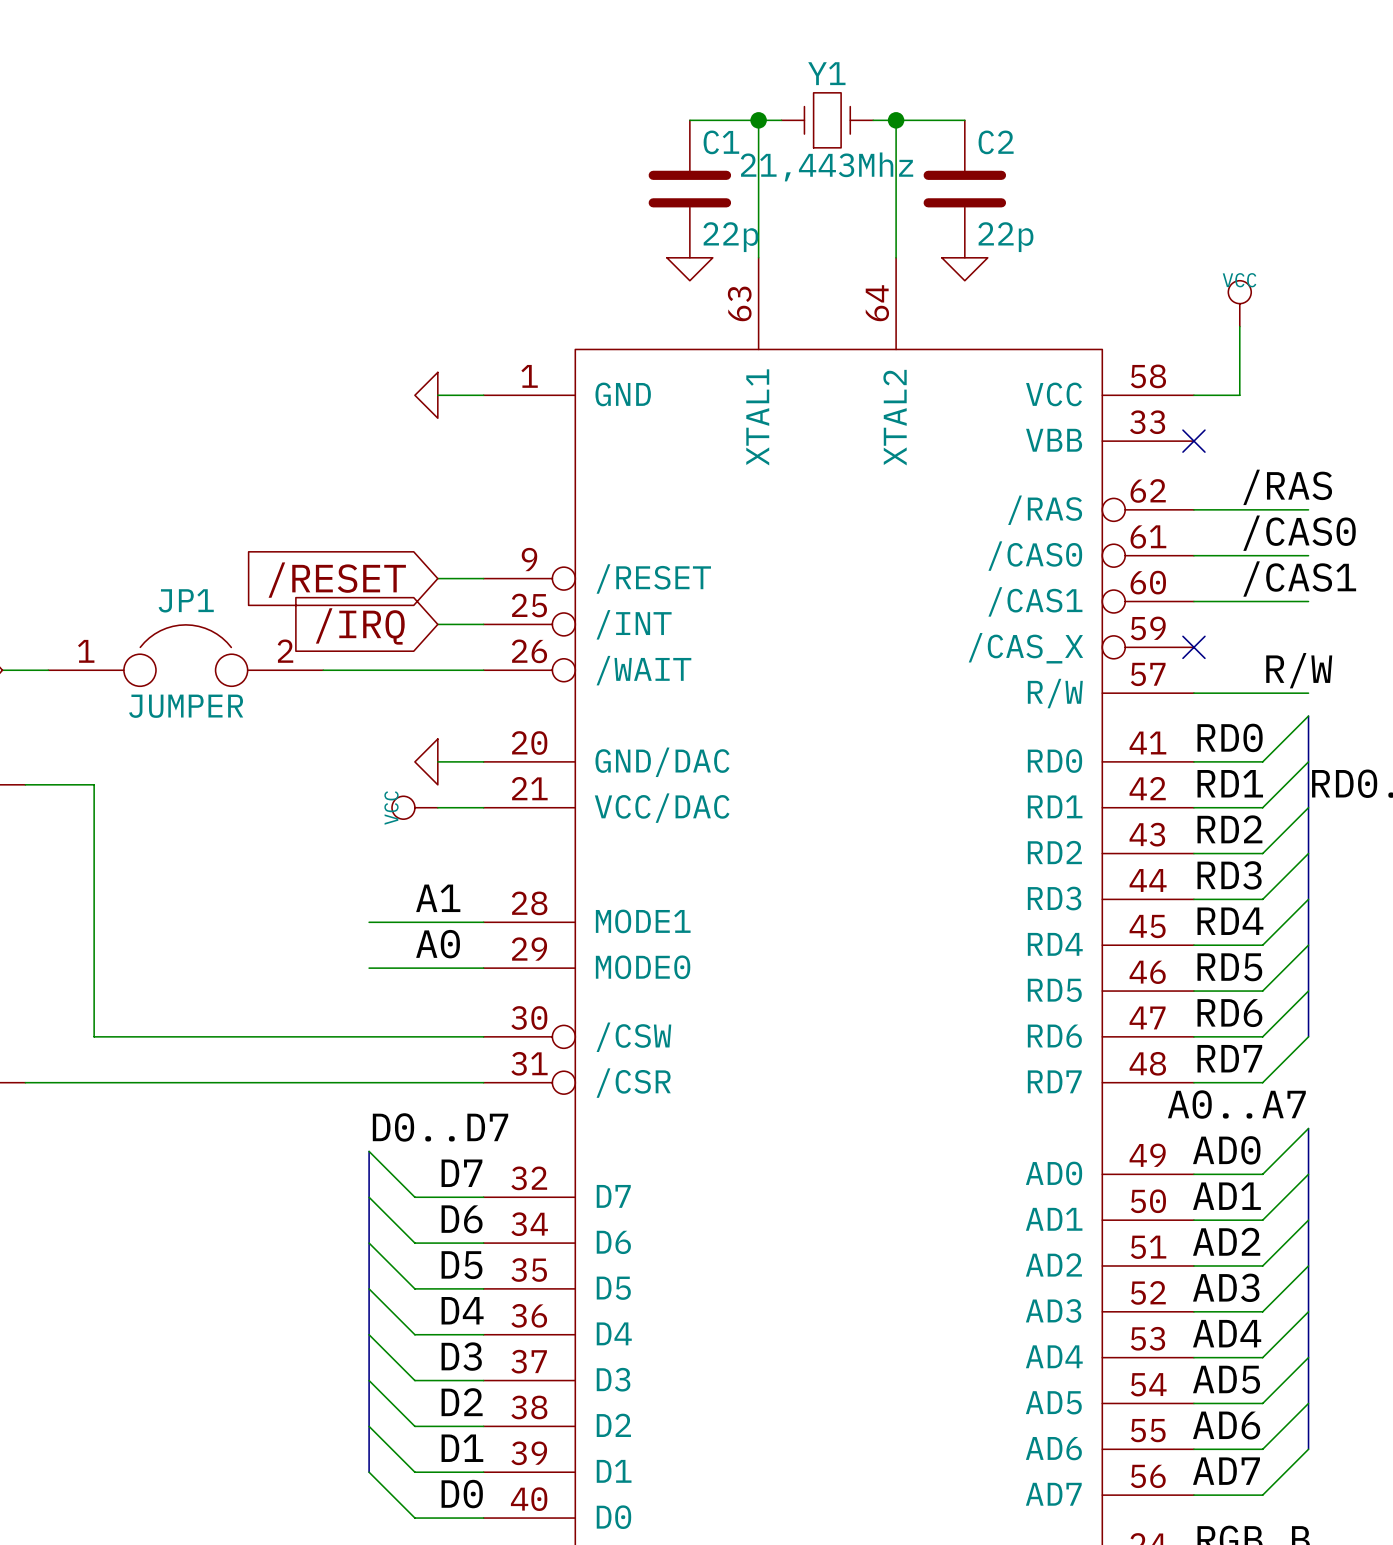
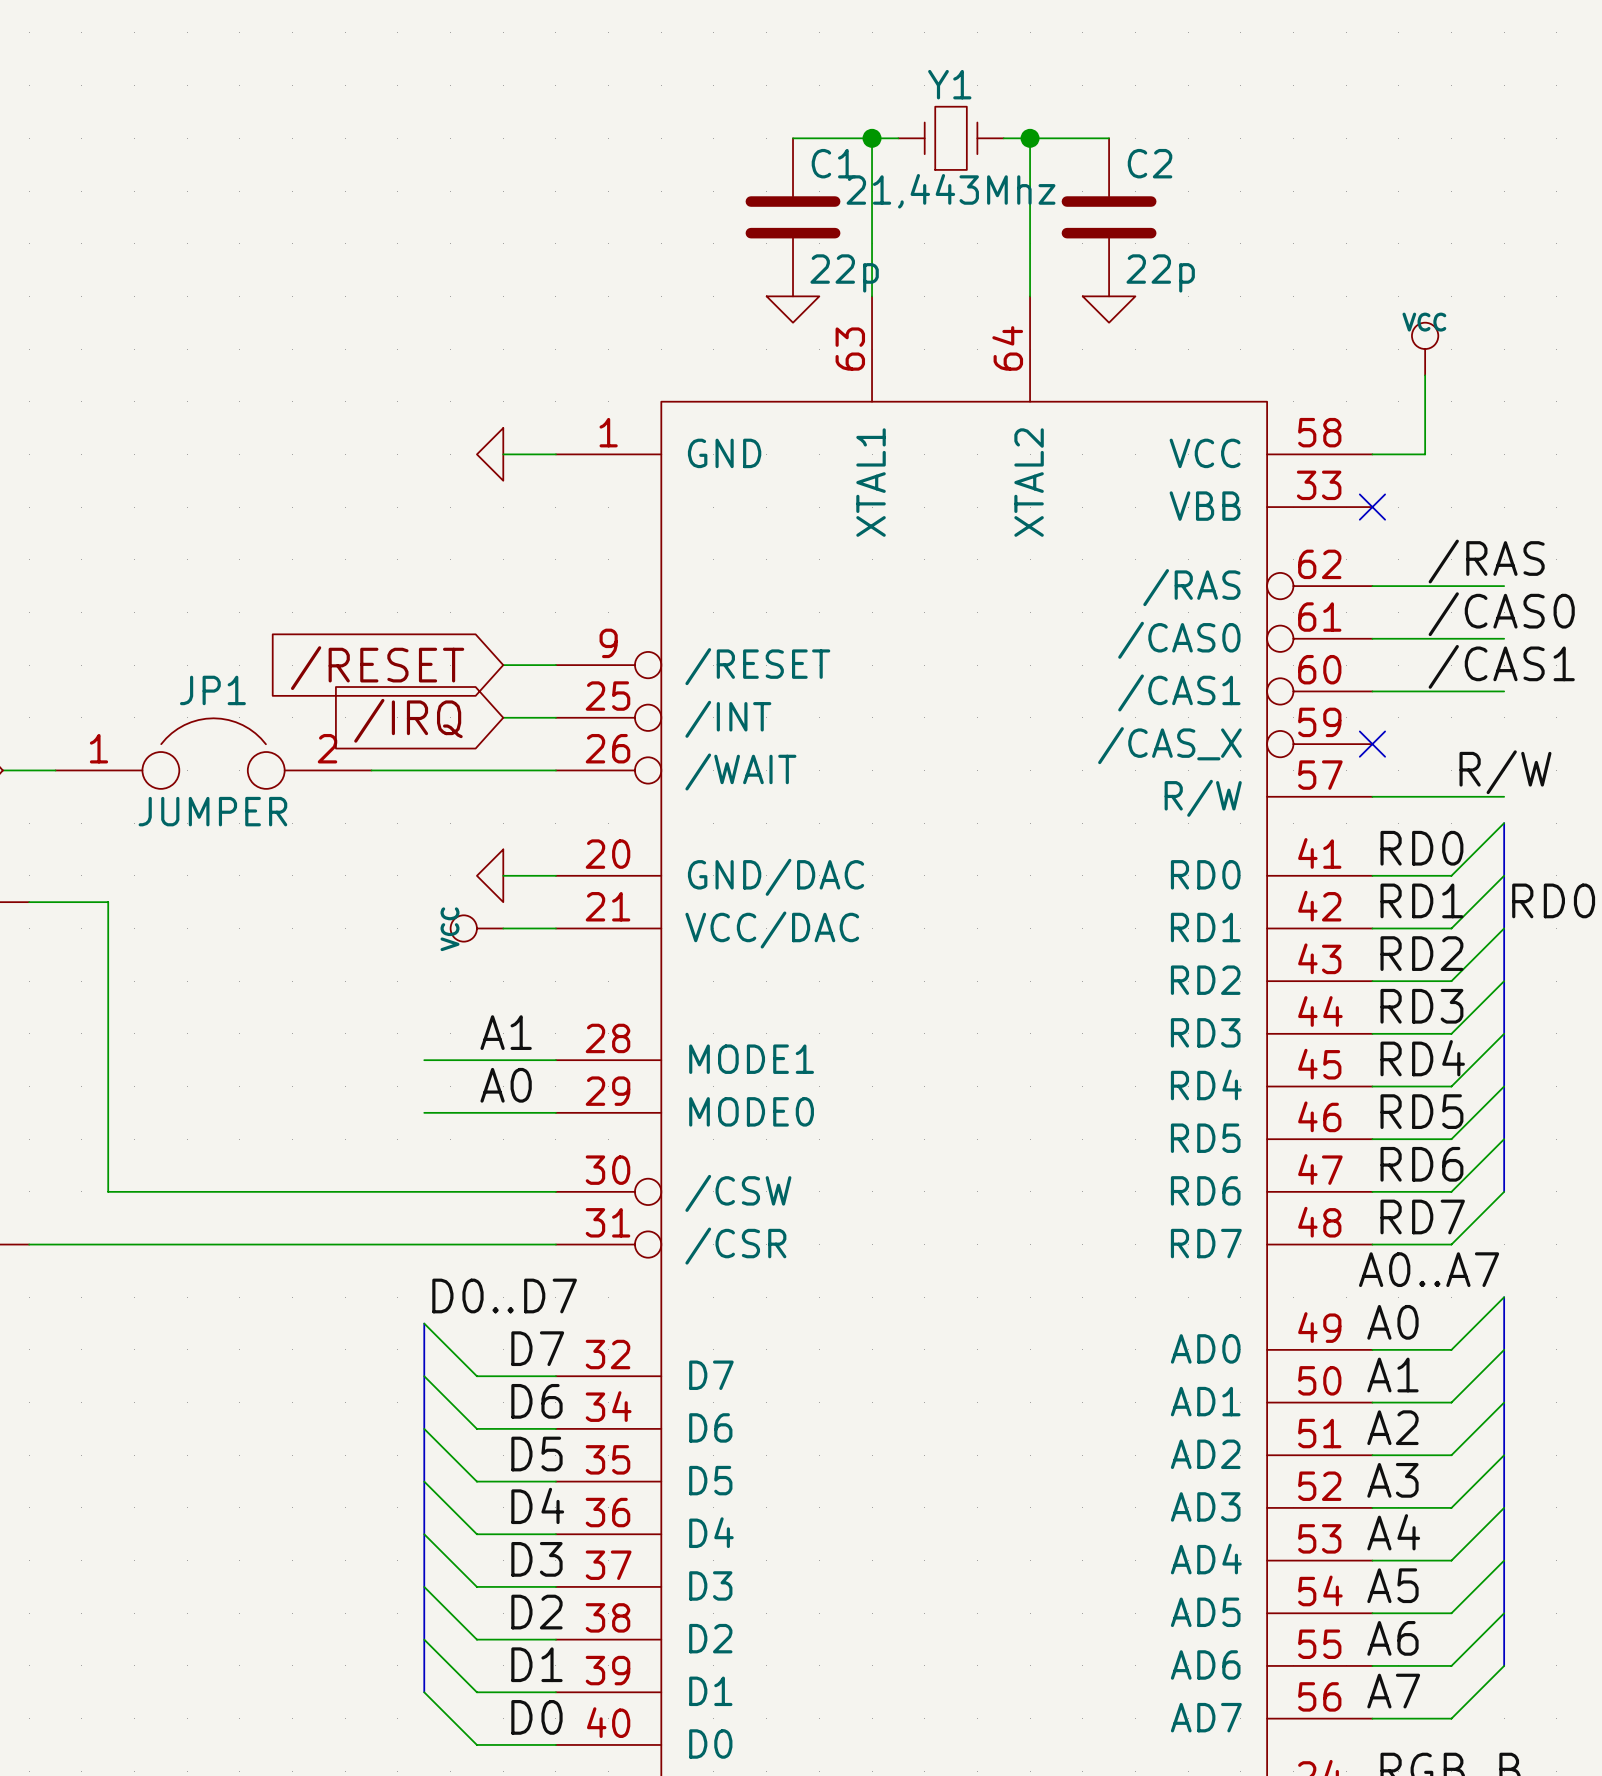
label: AD0 (1226, 1150) -> A0 (1392, 1322)
label: AD1 (1226, 1196) -> A1 (1392, 1375)
label: AD2 (1226, 1241) -> A2 (1392, 1427)
label: AD3 (1226, 1287) -> A3 (1392, 1480)
label: AD4 (1227, 1333) -> A4 (1393, 1532)
label: AD5 (1226, 1379) -> A5 (1392, 1585)
label: AD6 (1226, 1425) -> A6 (1392, 1638)
label: AD7 (1226, 1471) -> A7 (1393, 1691)

